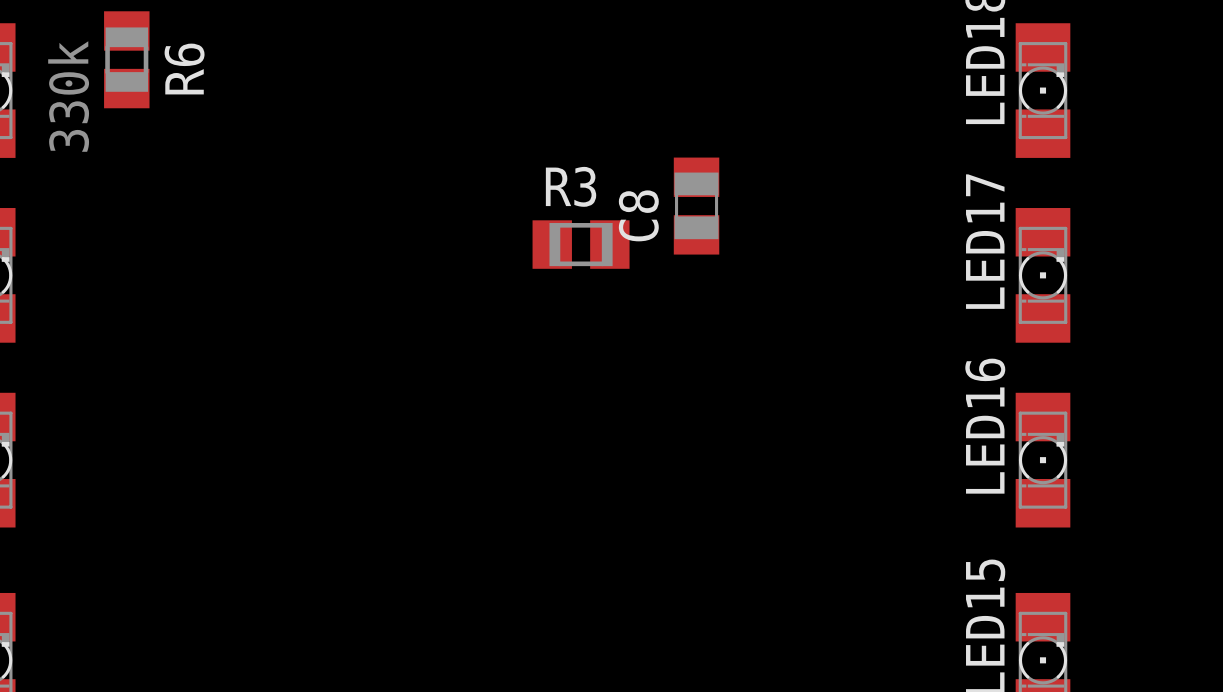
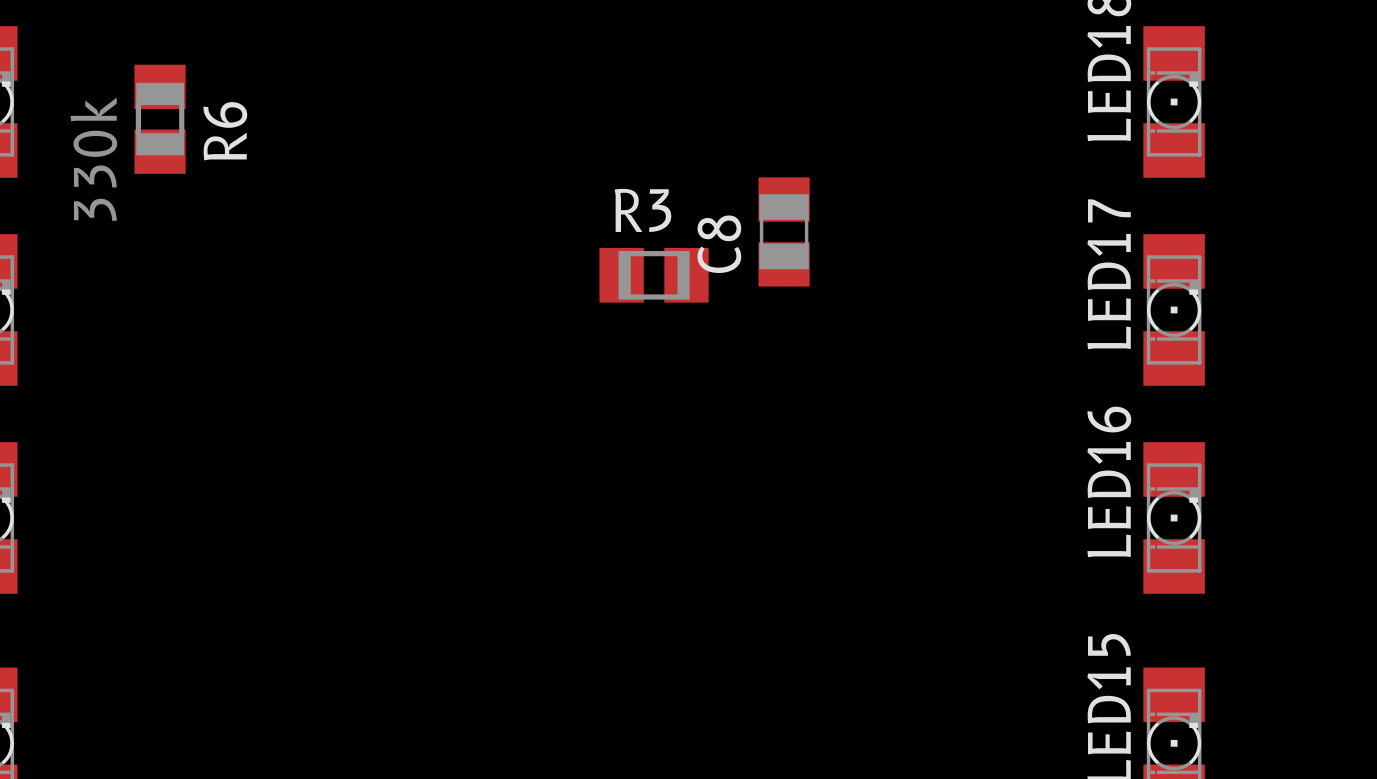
R6 position: (126, 59) -> (160, 119)

